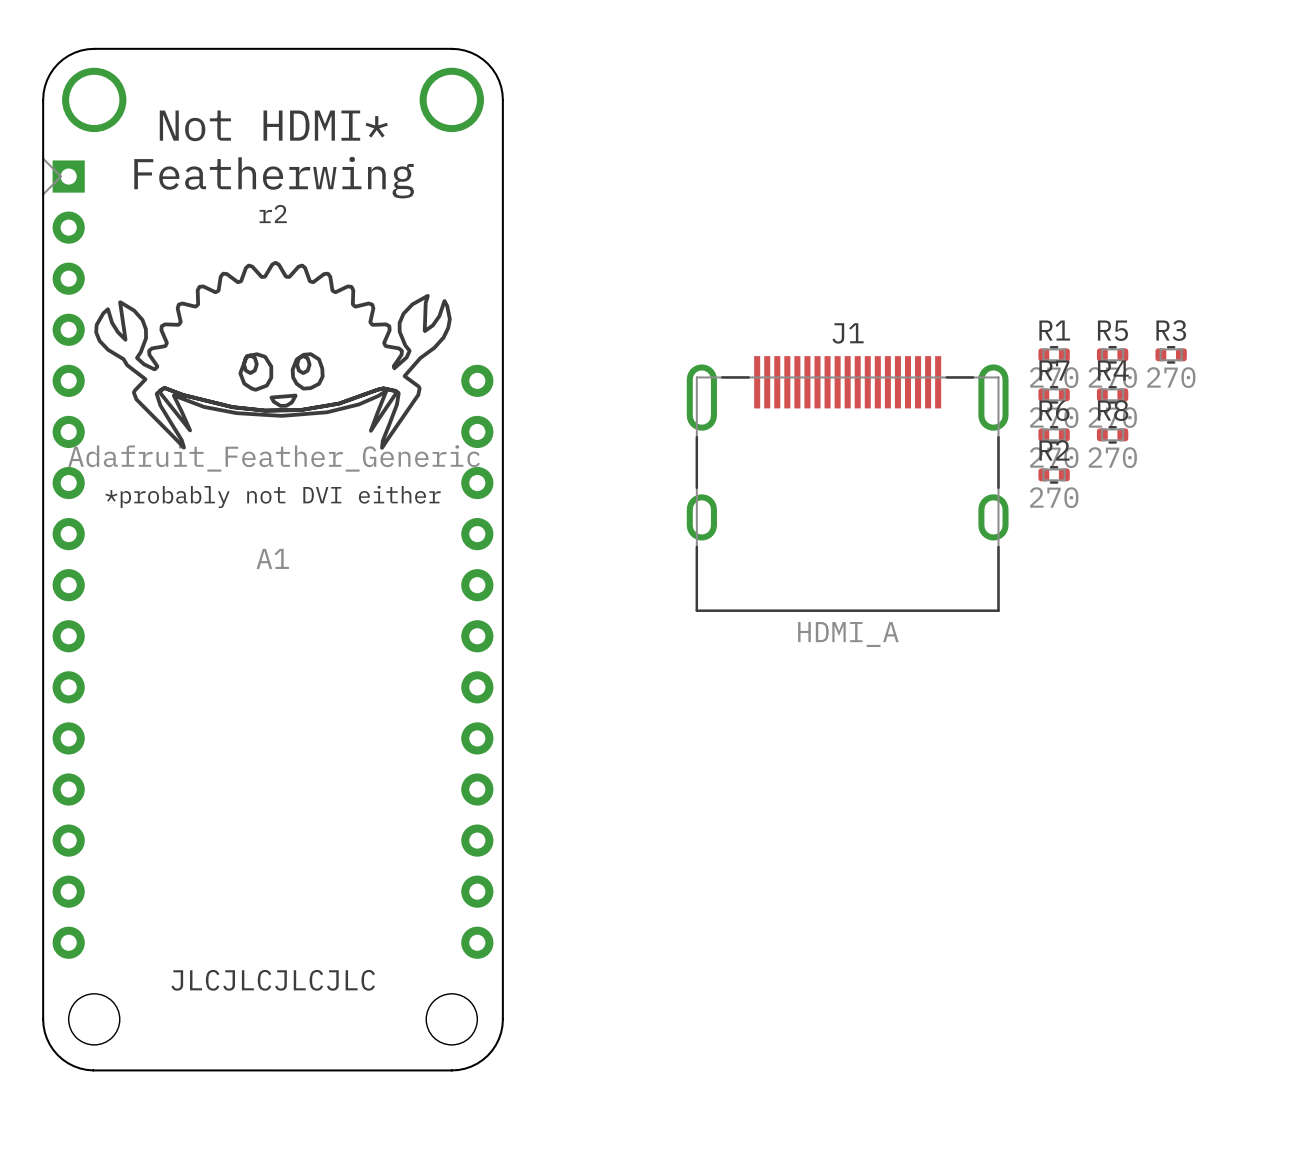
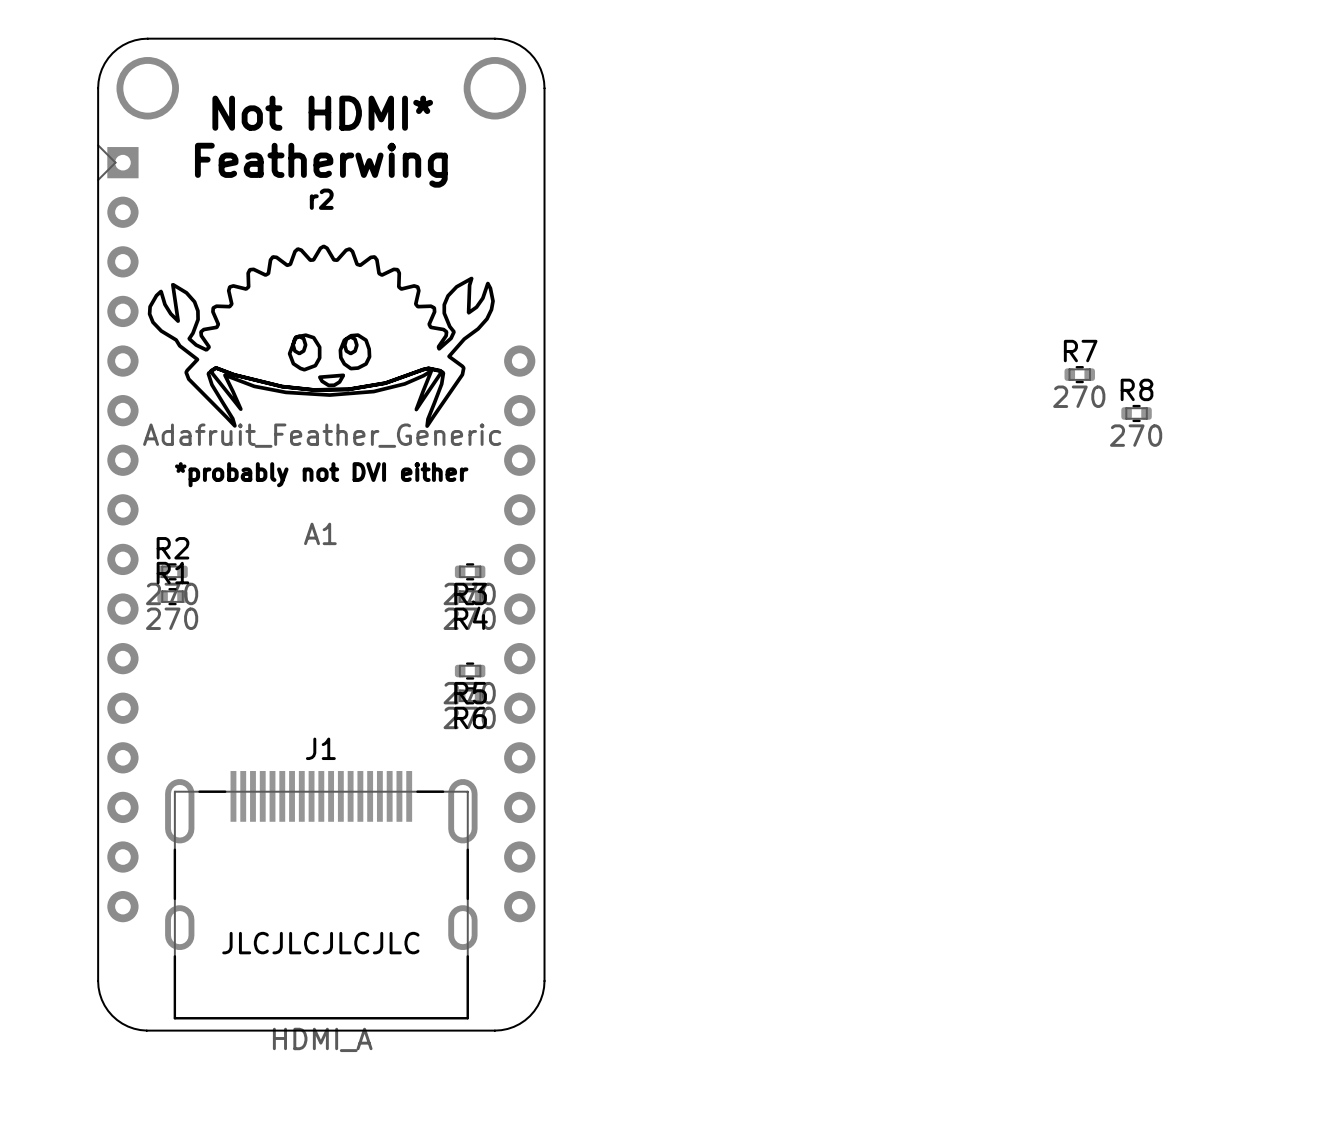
A1 footprint: [42, 47, 504, 1072] -> [97, 37, 546, 1032]
R5 name position: R5 (1112, 330) -> R5 (470, 693)
R3 name position: R3 (1171, 330) -> R3 (470, 593)
R1 position: (1054, 354) -> (172, 596)
R5 position: (1112, 354) -> (470, 671)
R3 position: (1171, 354) -> (470, 571)
R4 name position: R4 (1113, 370) -> R4 (471, 618)
R4 position: (1112, 394) -> (470, 596)
R6 name position: R6 (1054, 410) -> R6 (470, 717)
R6 position: (1054, 434) -> (470, 695)
R2 position: (1054, 474) -> (172, 571)
J1 position: (847, 484) -> (321, 895)

